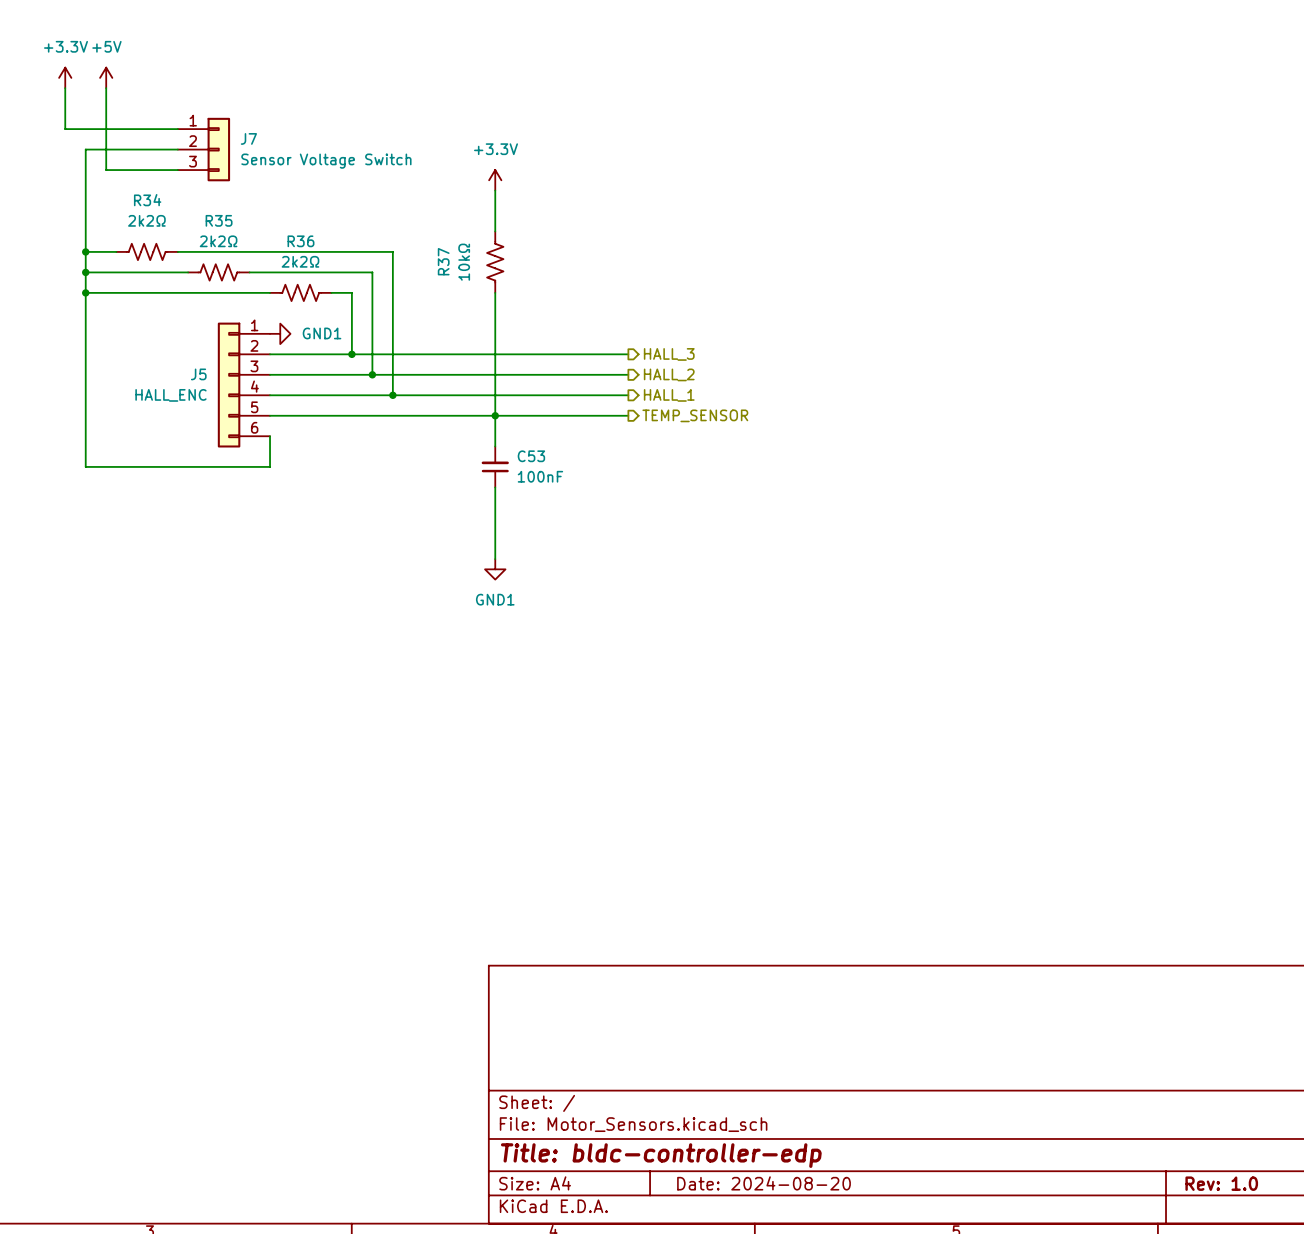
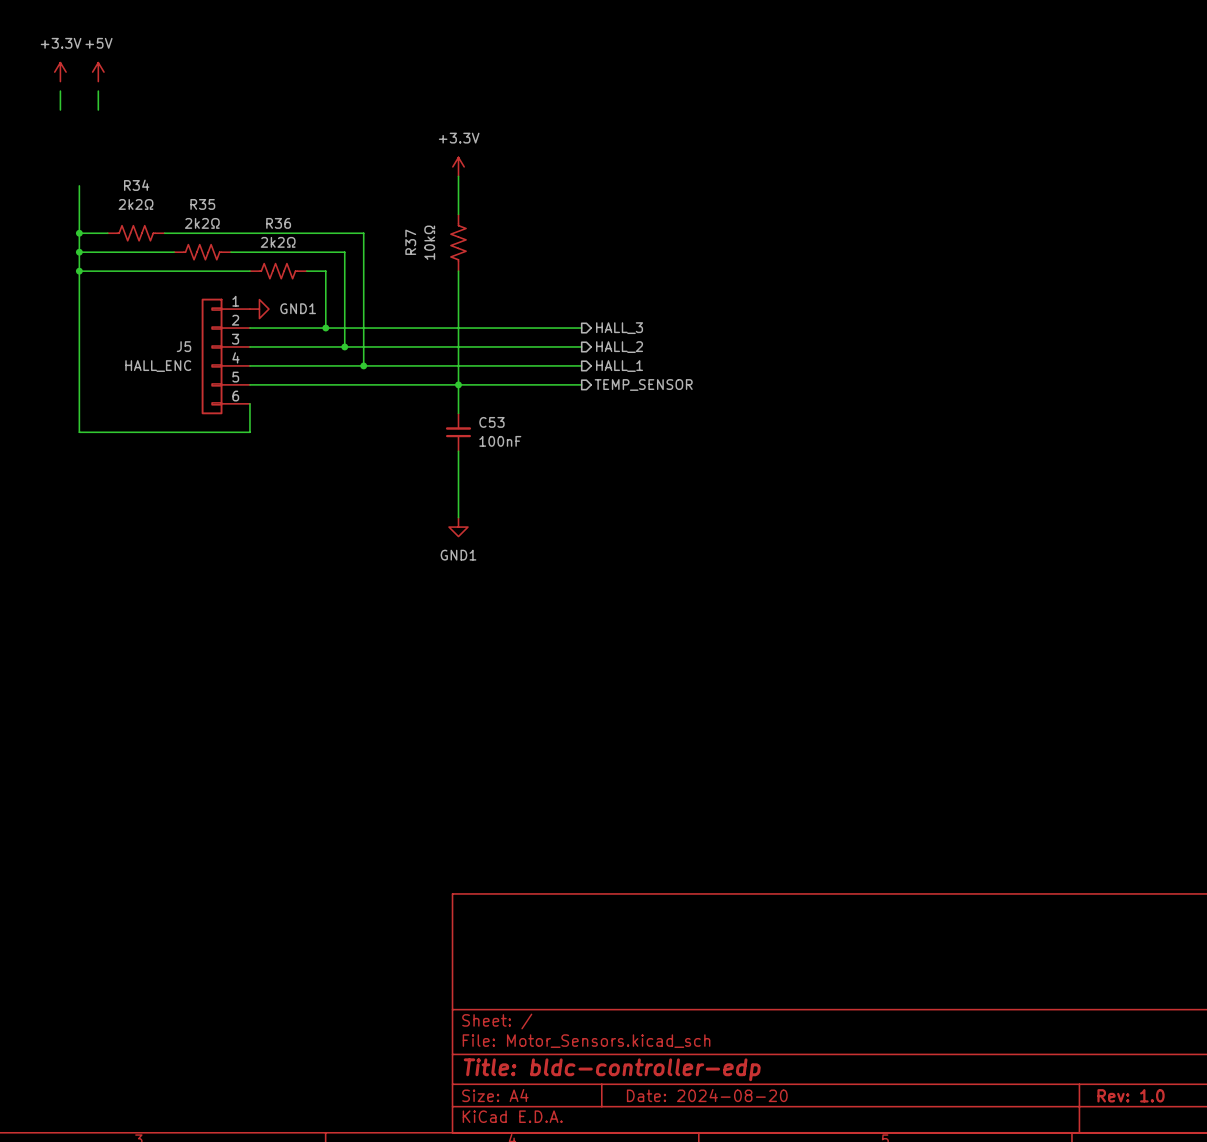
wire: (65, 88) (65, 98) -> none
wire: (106, 88) (106, 98) -> none
wire: (65, 118) (65, 129) (177, 129) -> none
wire: (106, 118) (106, 170) (177, 170) -> none
wire: (177, 149) (85, 149) (85, 200) -> none
J7: Sensor Voltage Switch (203, 149) -> none

